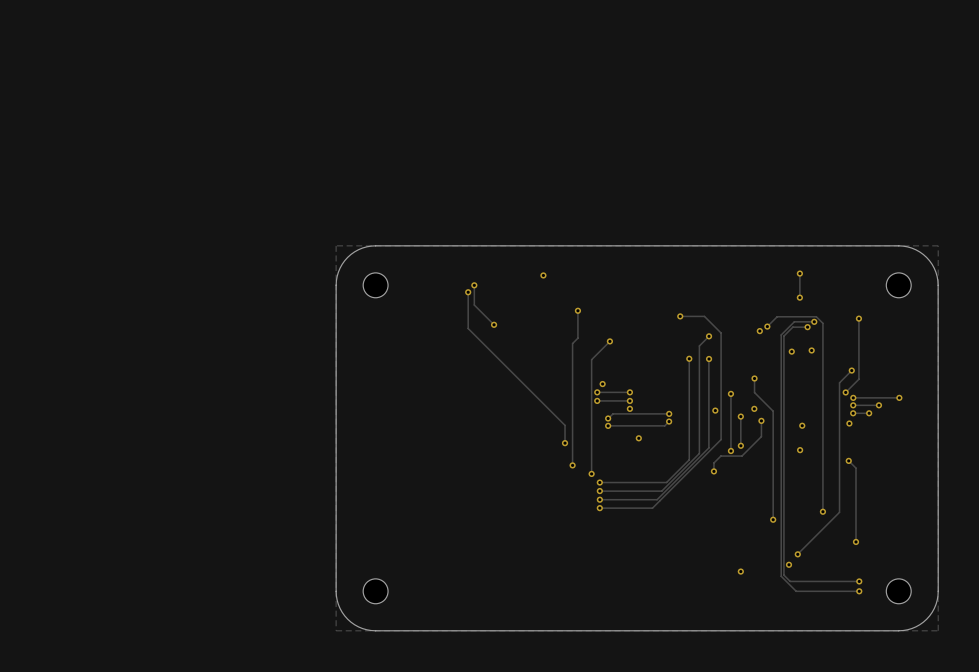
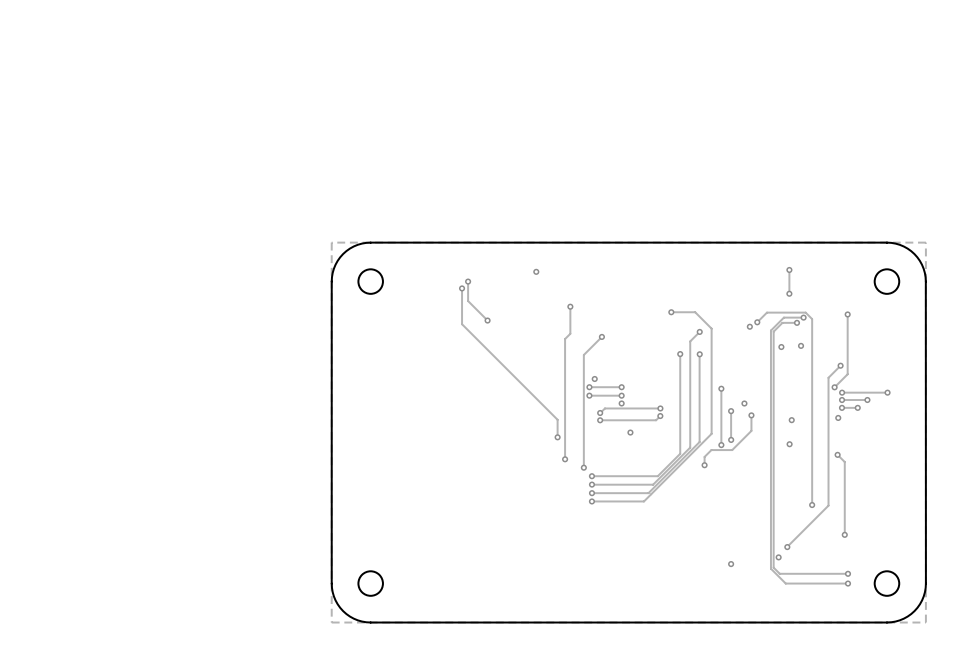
track: (754, 378) (754, 392) (773, 411) (773, 519) -> none
via: (754, 378) -> none
via: (715, 410) -> none
via: (773, 519) -> none

